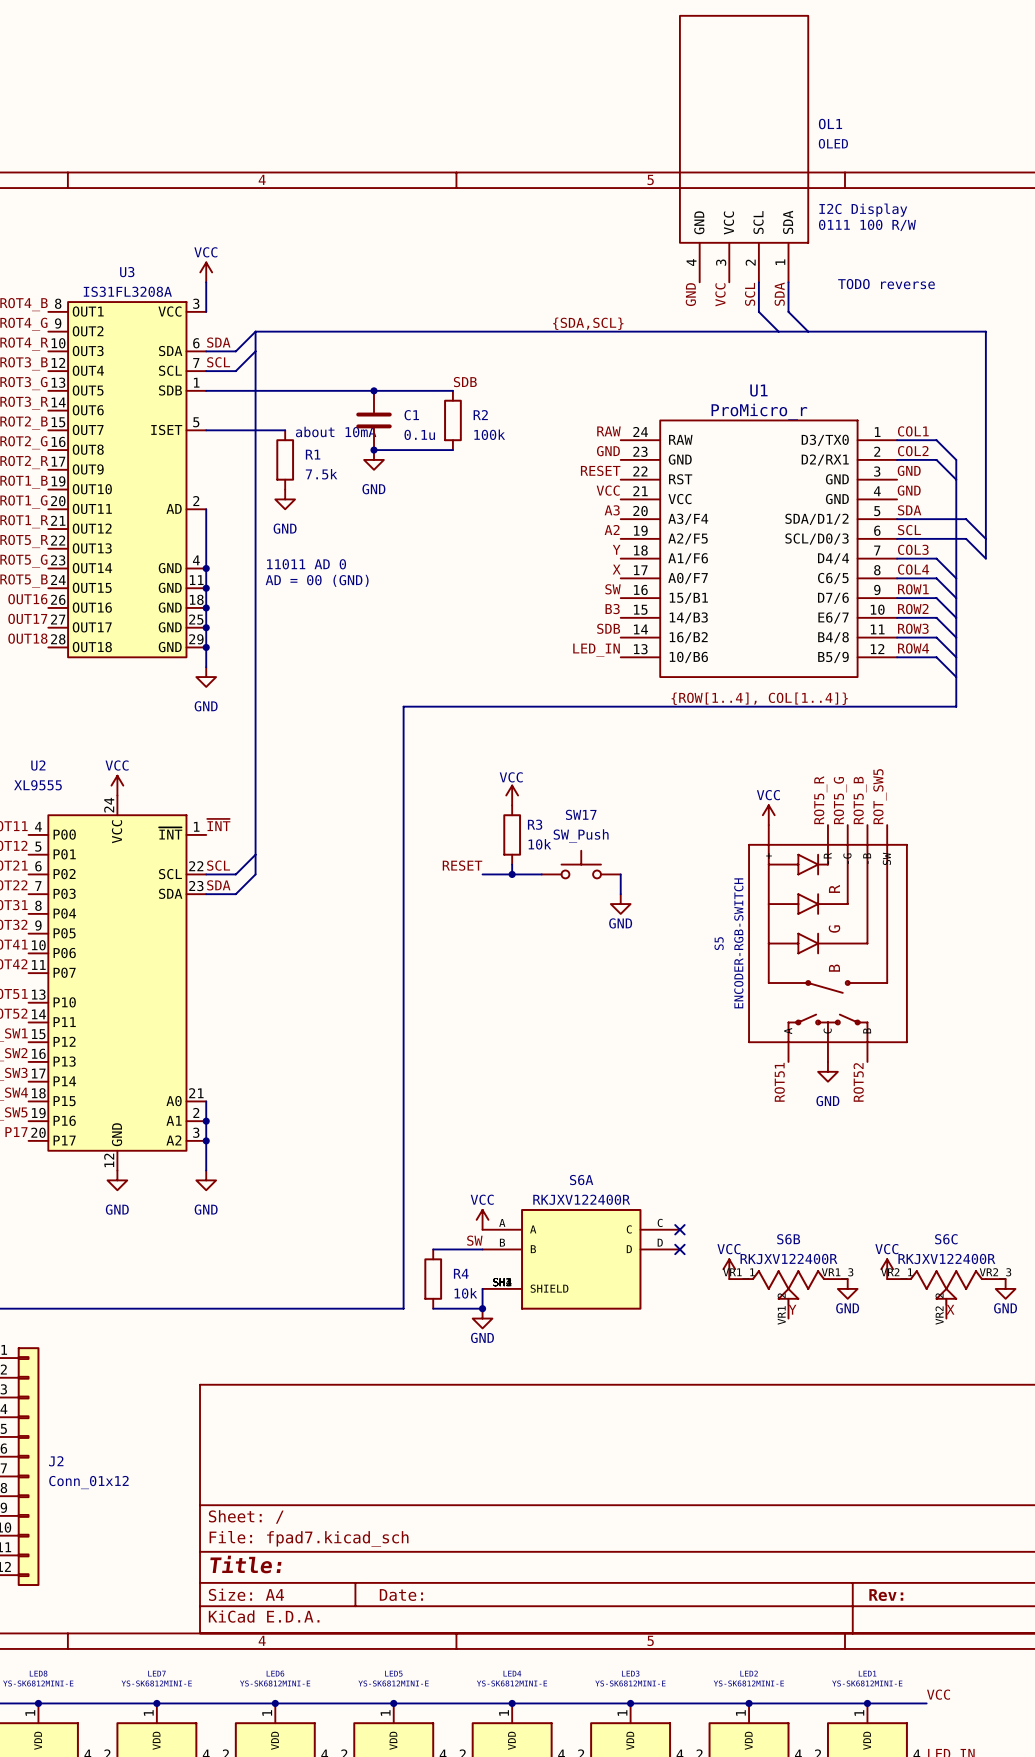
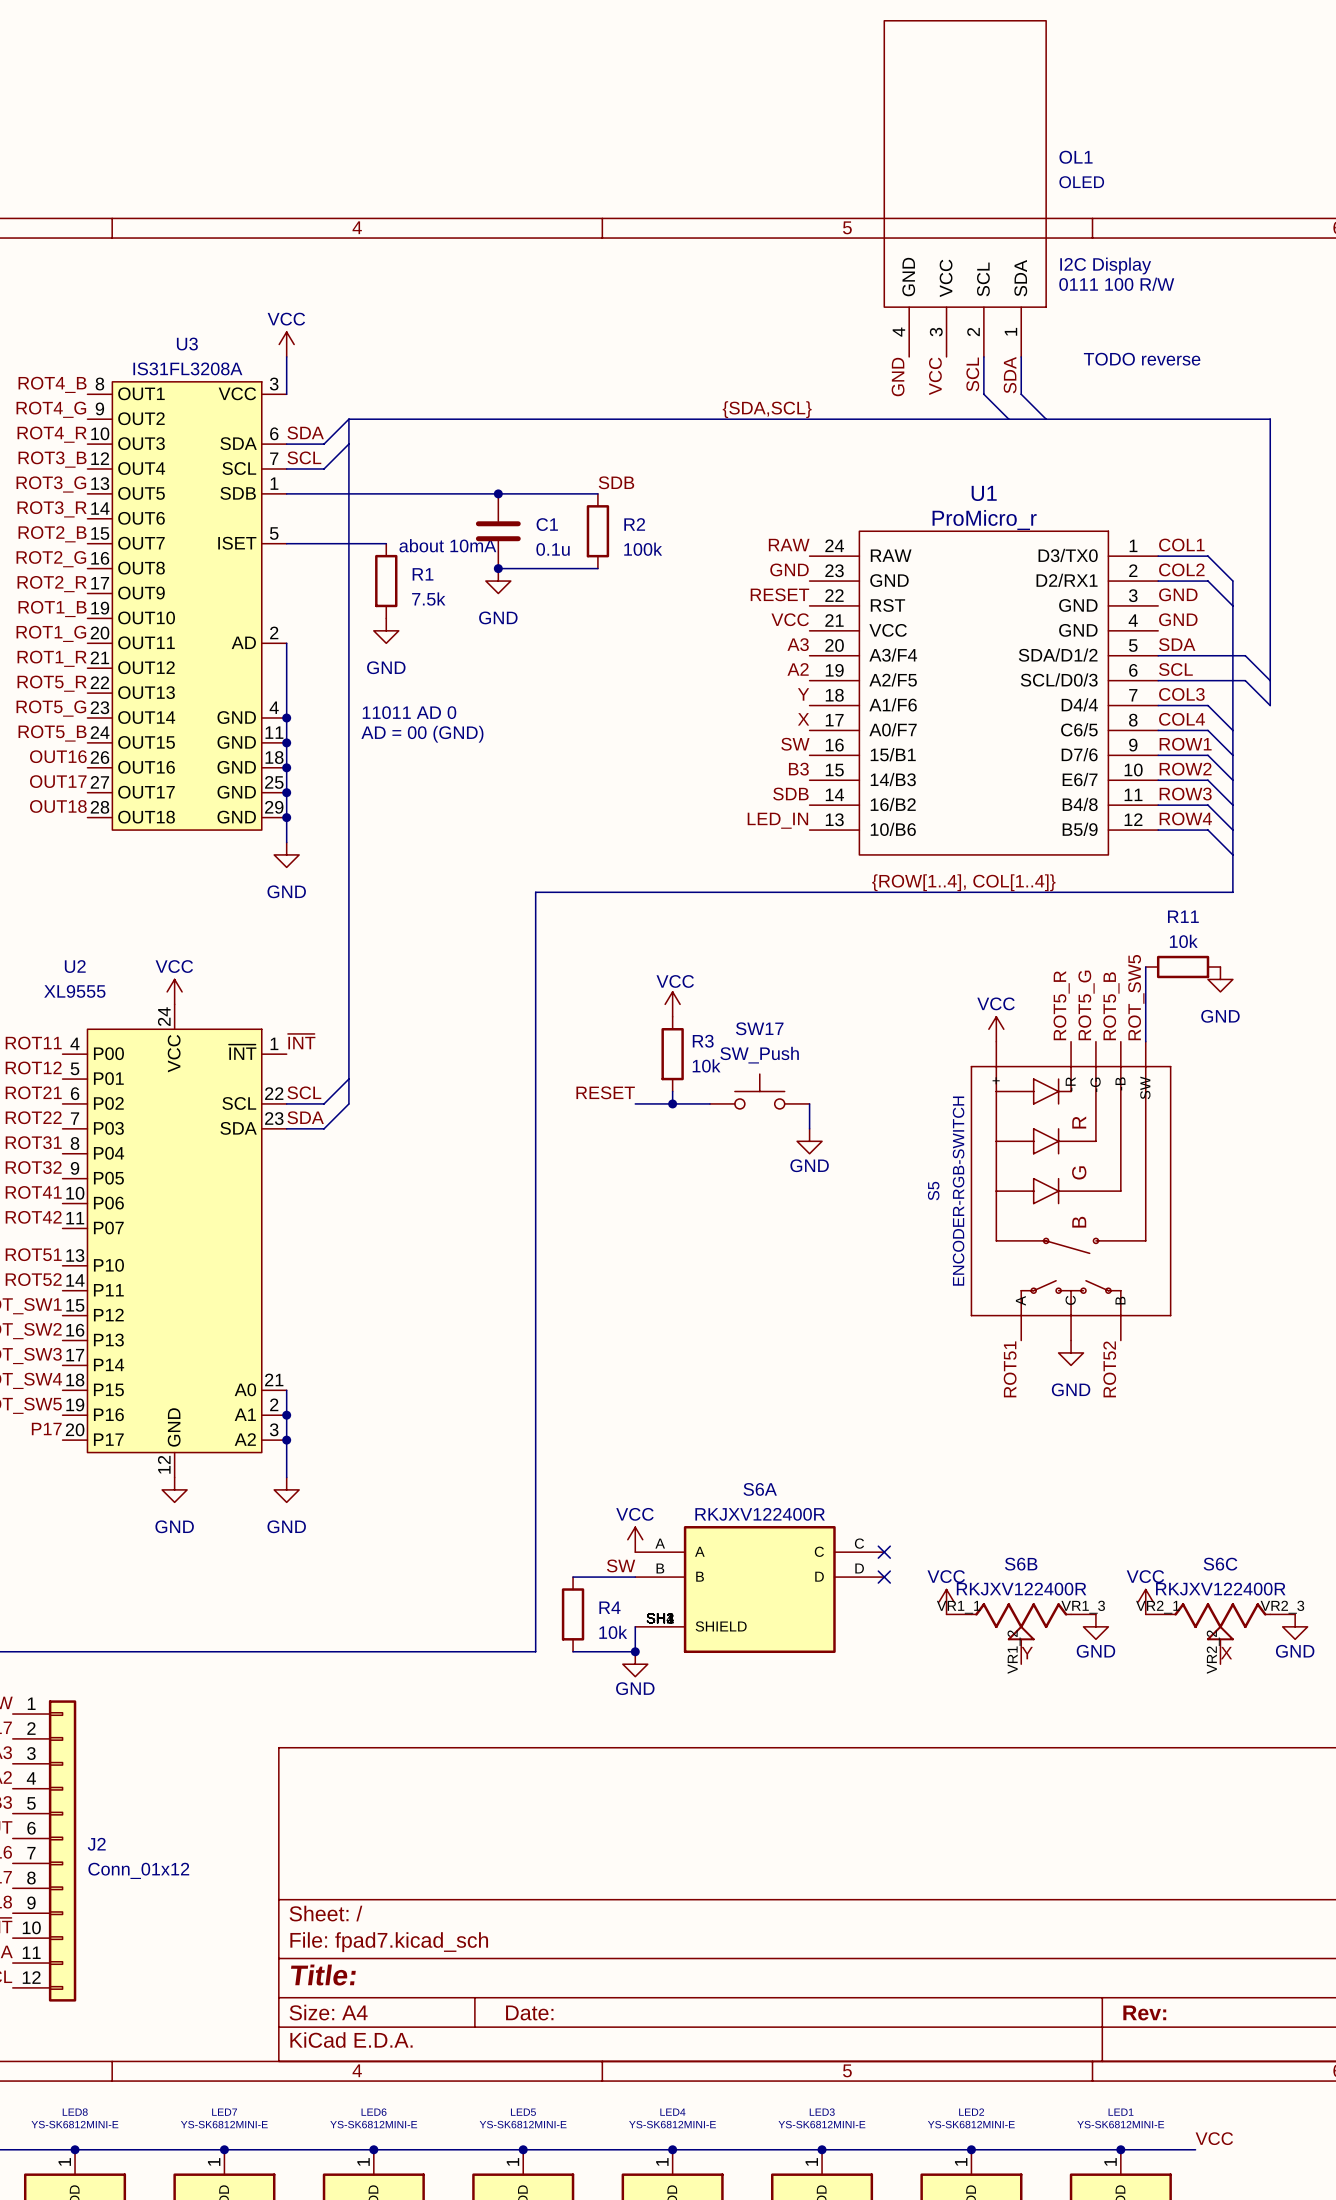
wire: none -> (1145, 967) (1145, 1041)
R11: none -> 10k (1183, 967)
power symbol: none -> GND (1220, 979)

